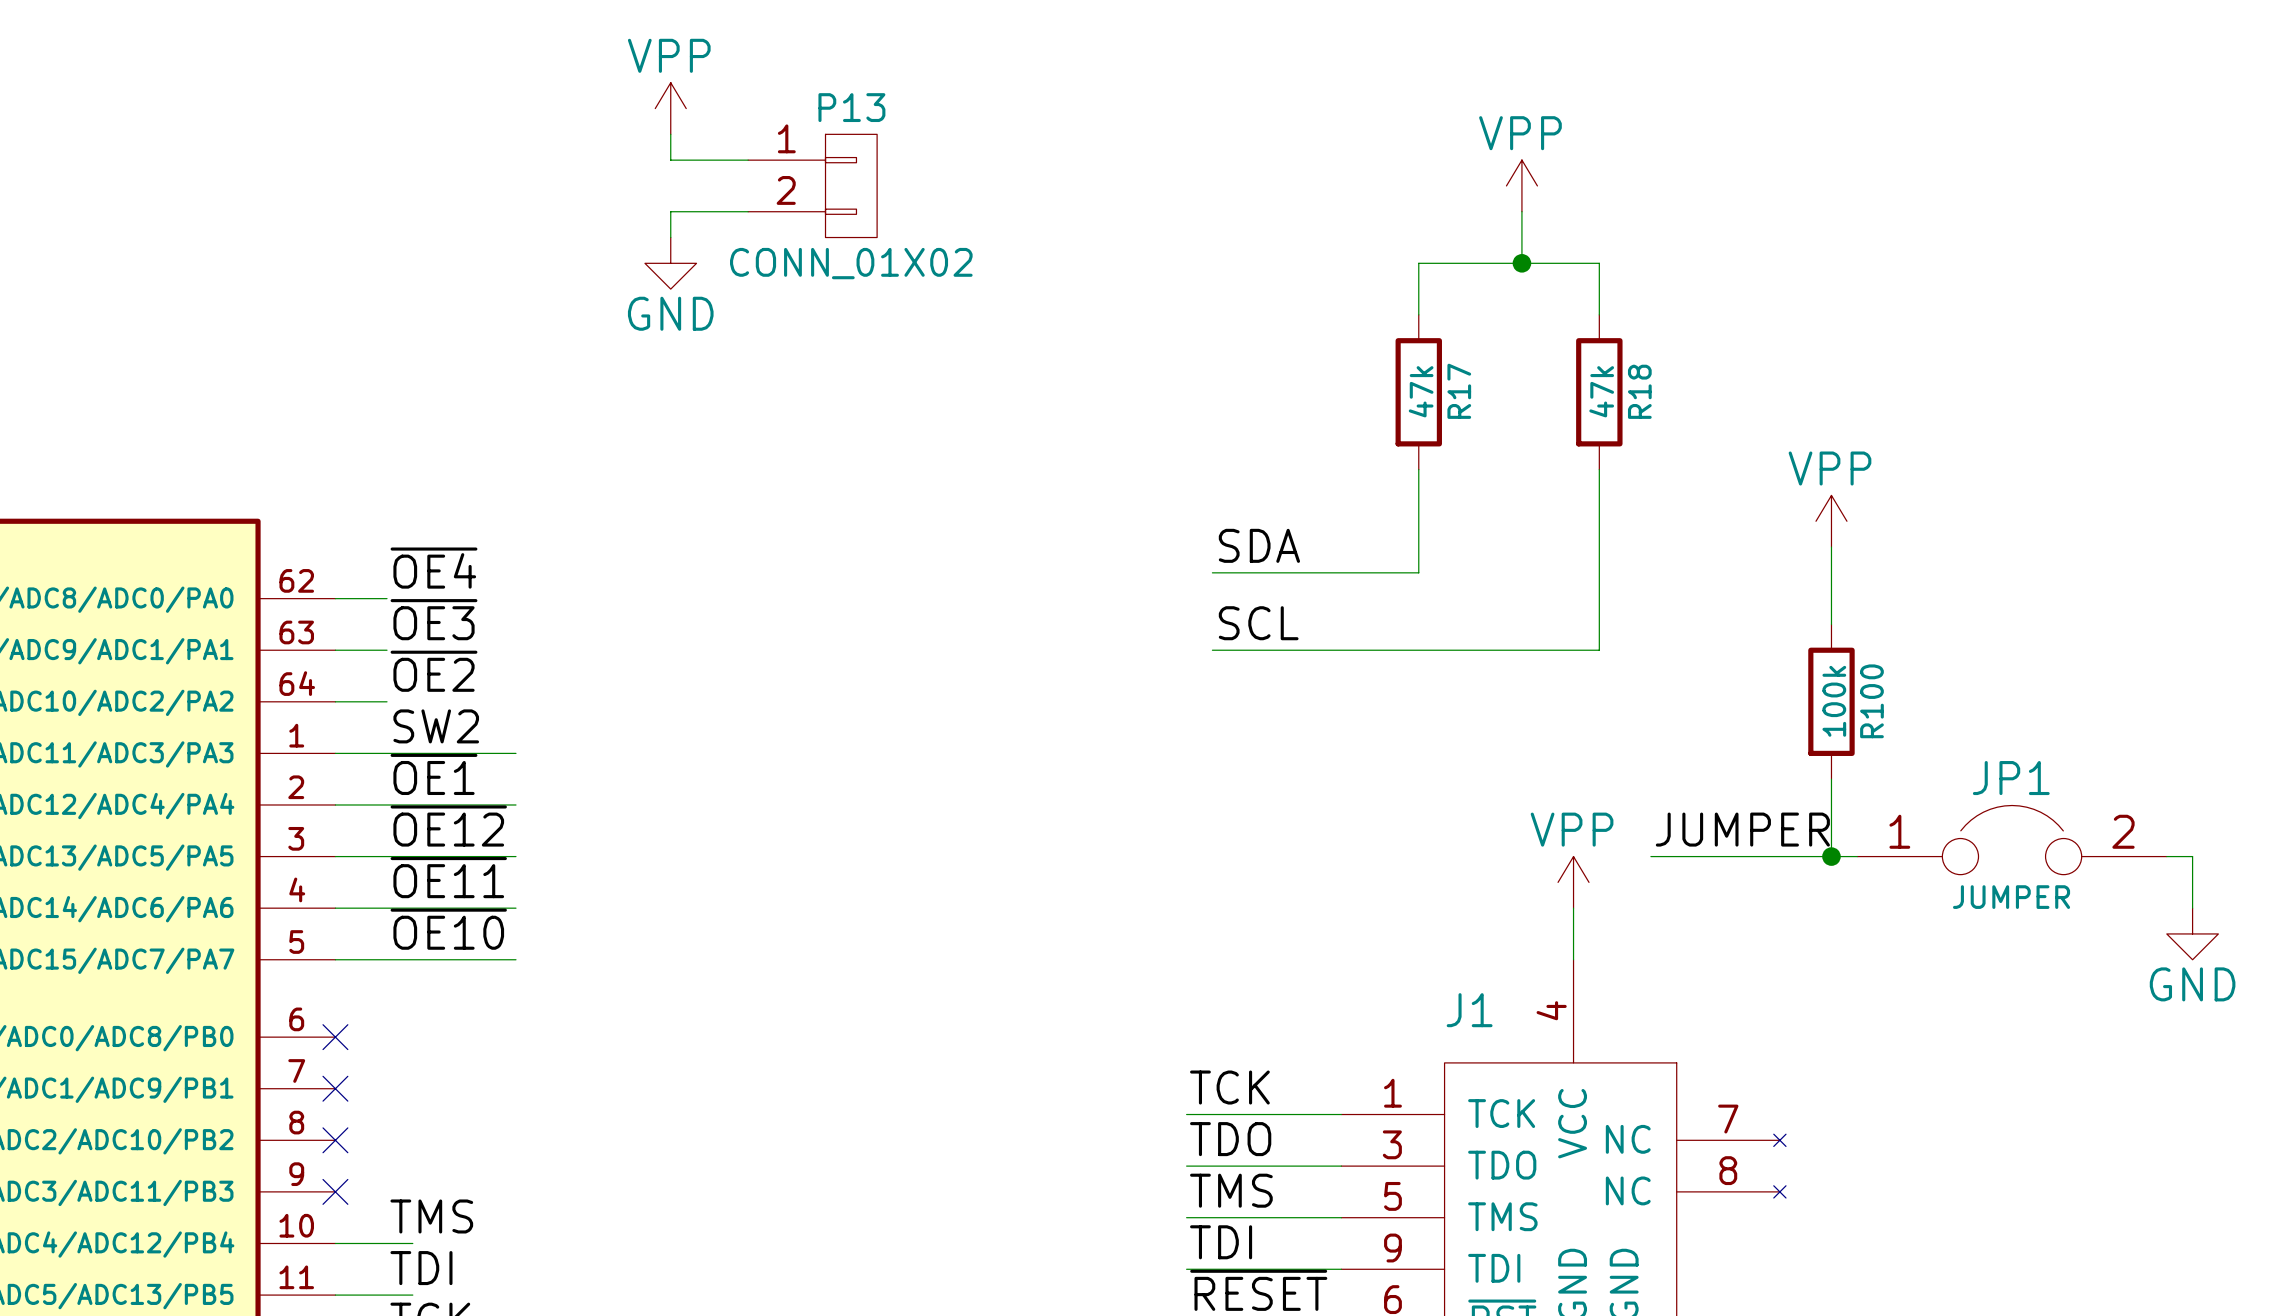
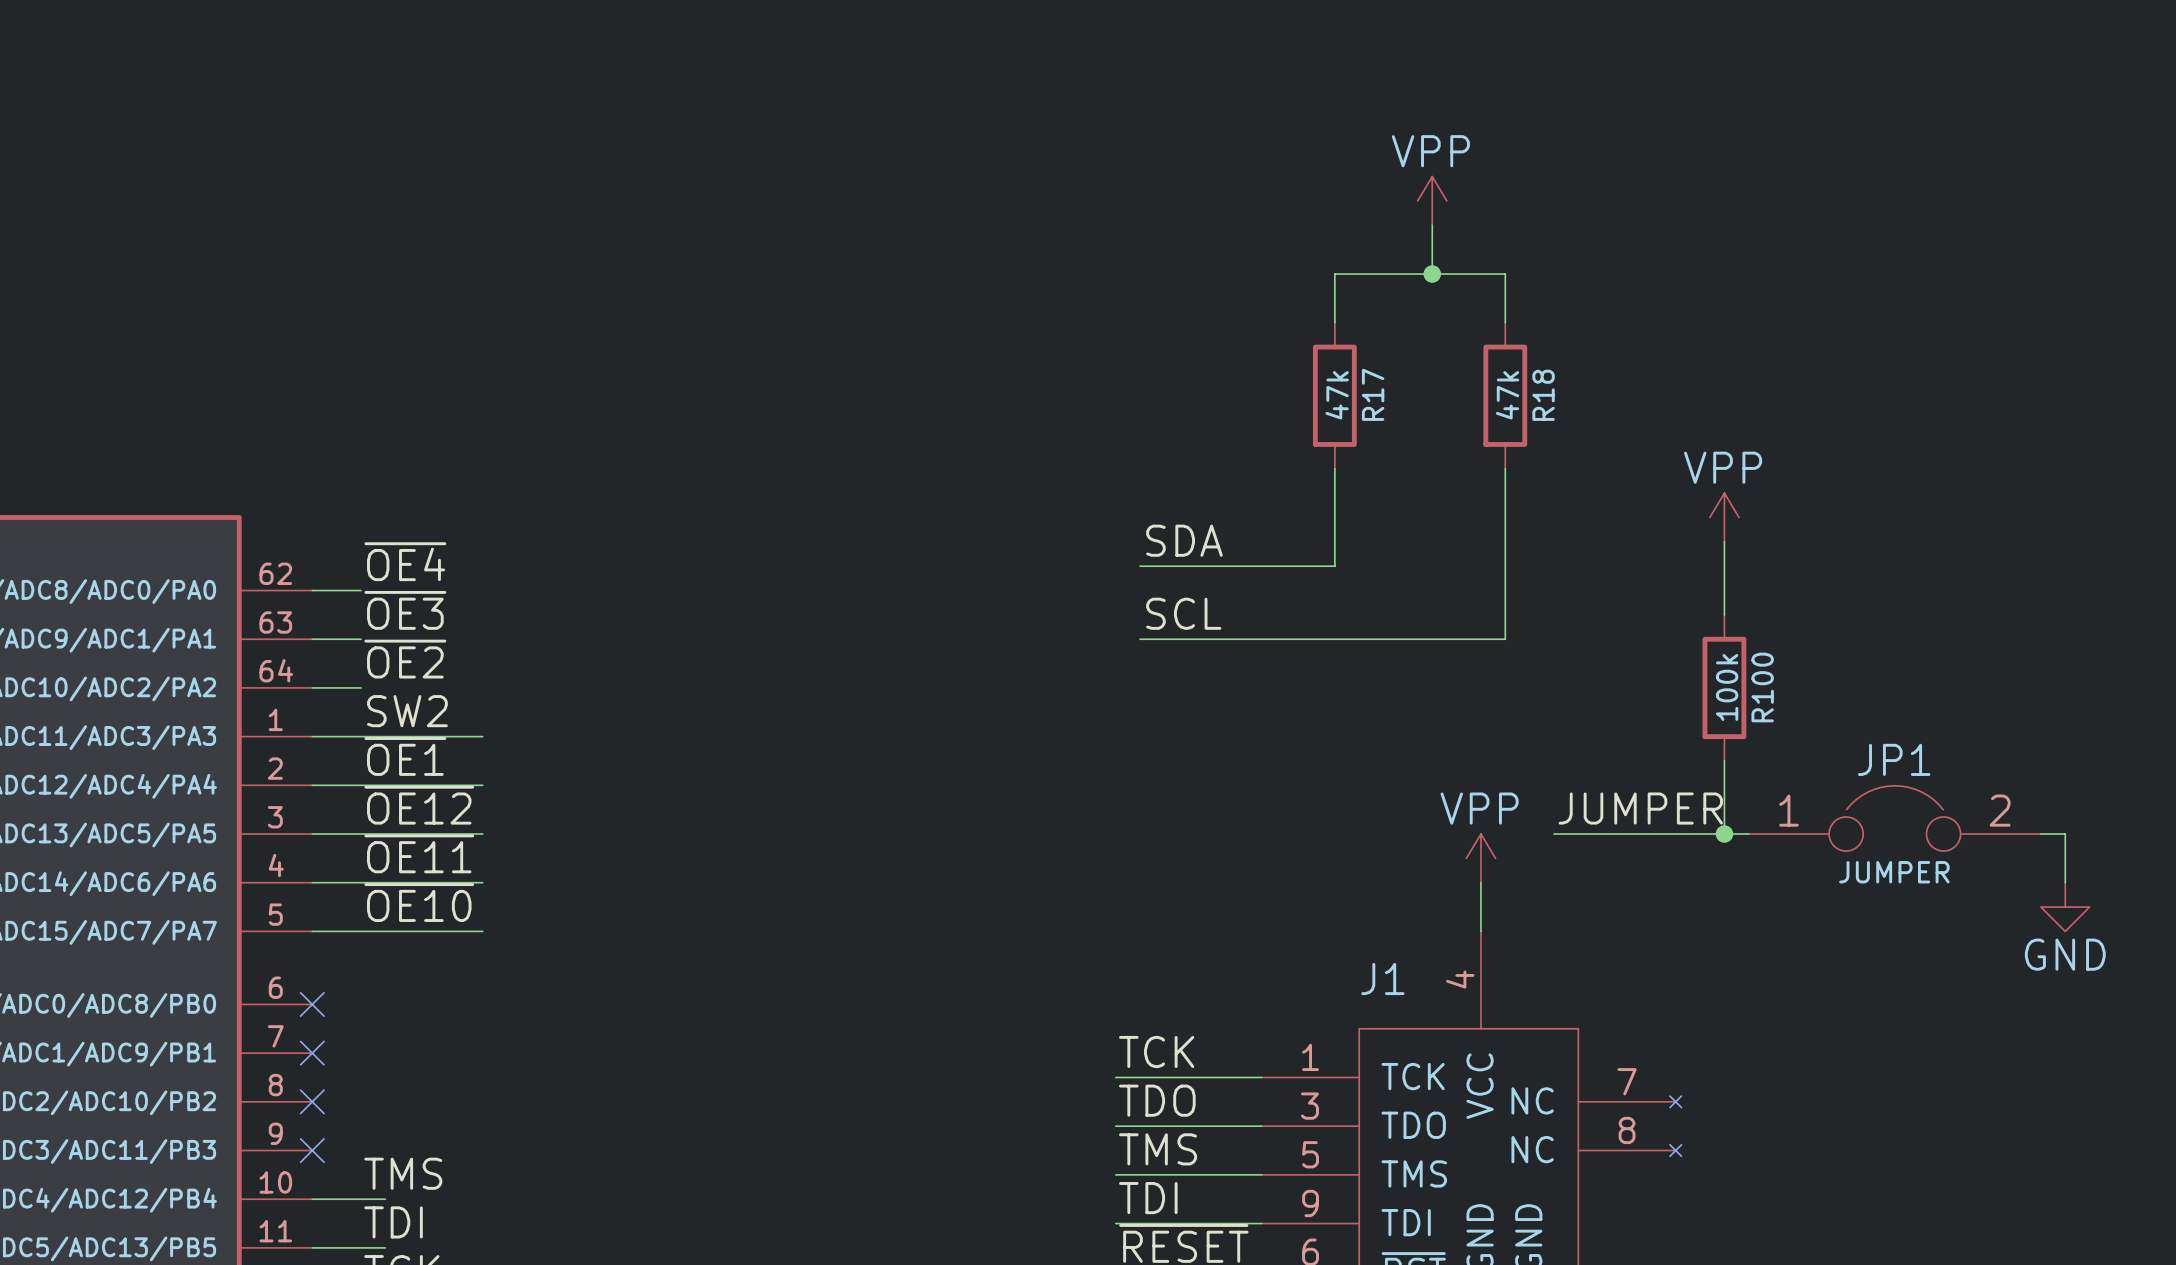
power symbol: VPP (670, 108) -> none
wire: (670, 134) (670, 160) (748, 160) -> none
P13: CONN_01X02 (812, 185) -> none
wire: (748, 211) (670, 211) (670, 237) -> none
power symbol: GND (670, 263) -> none

